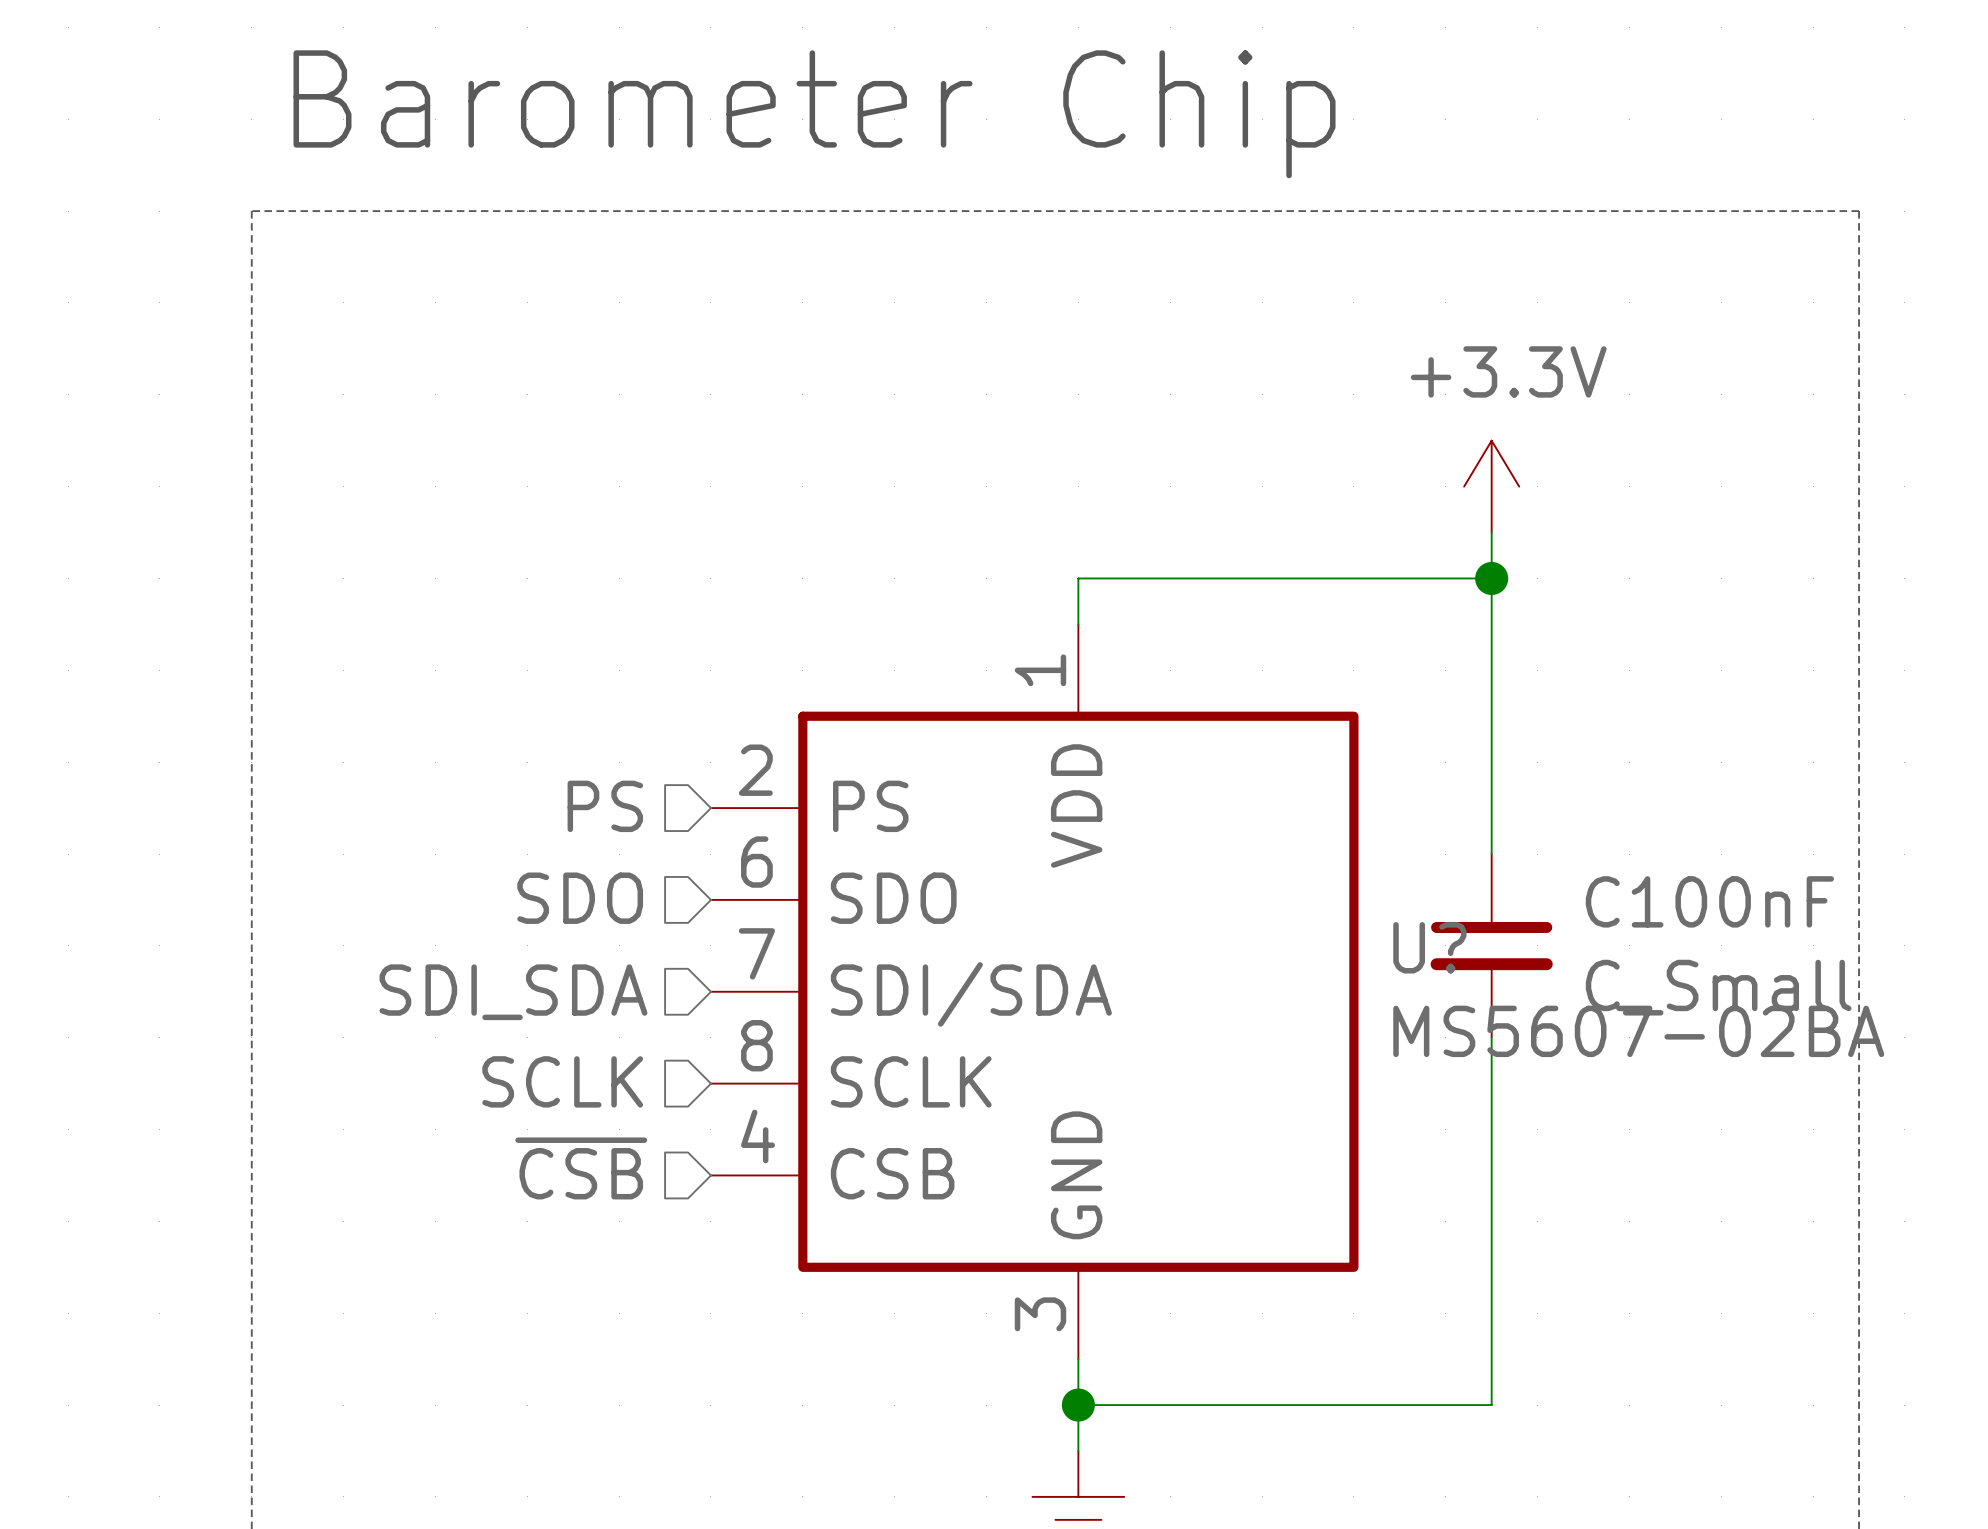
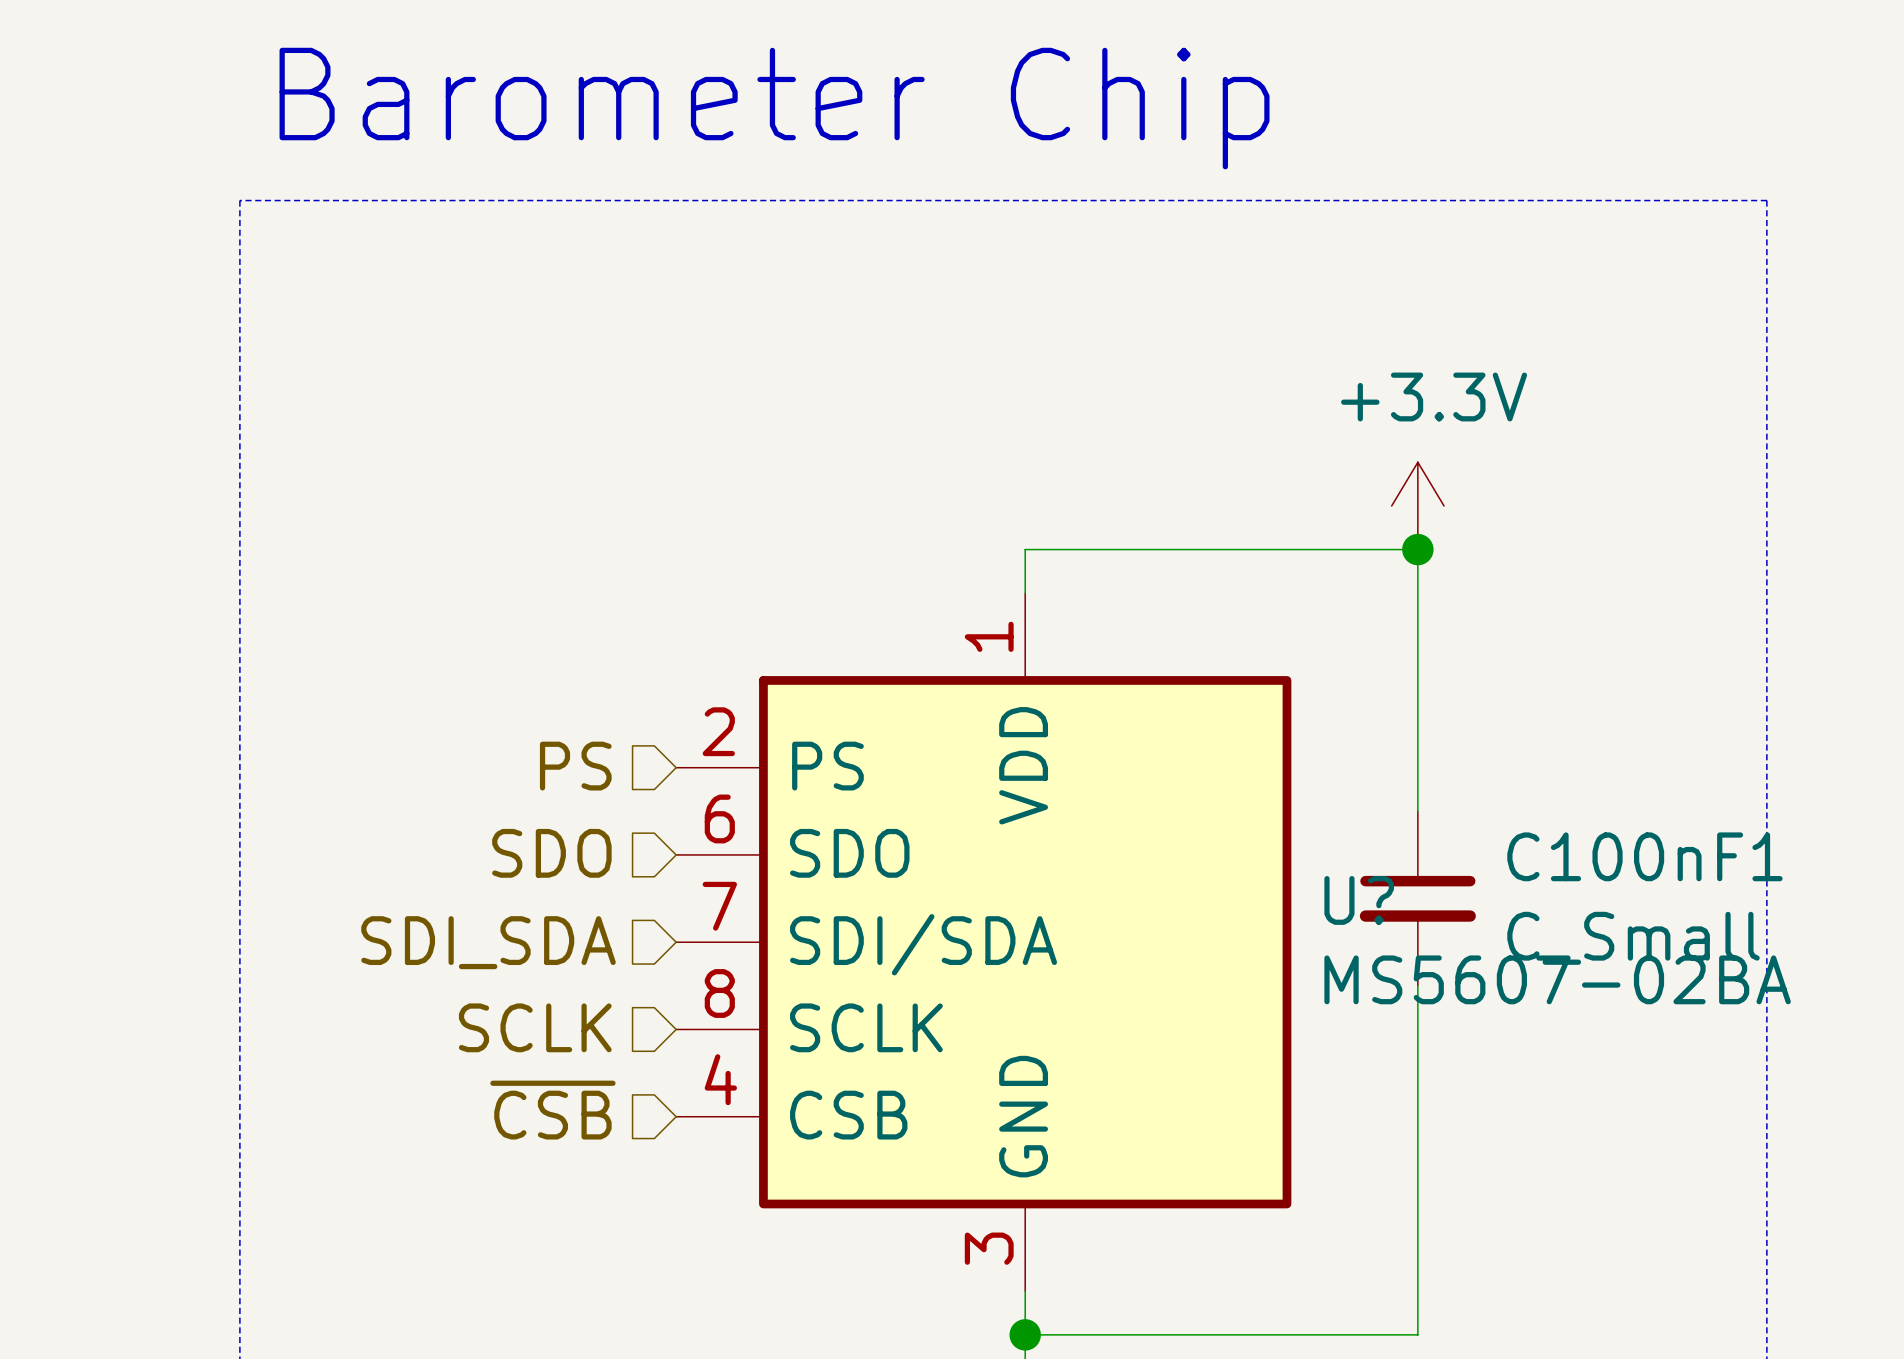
power symbol position: +3.3V (1491, 486) -> +3.3V (1417, 505)
C100nF name: C100nF (1709, 901) -> C100nF1 (1644, 856)

